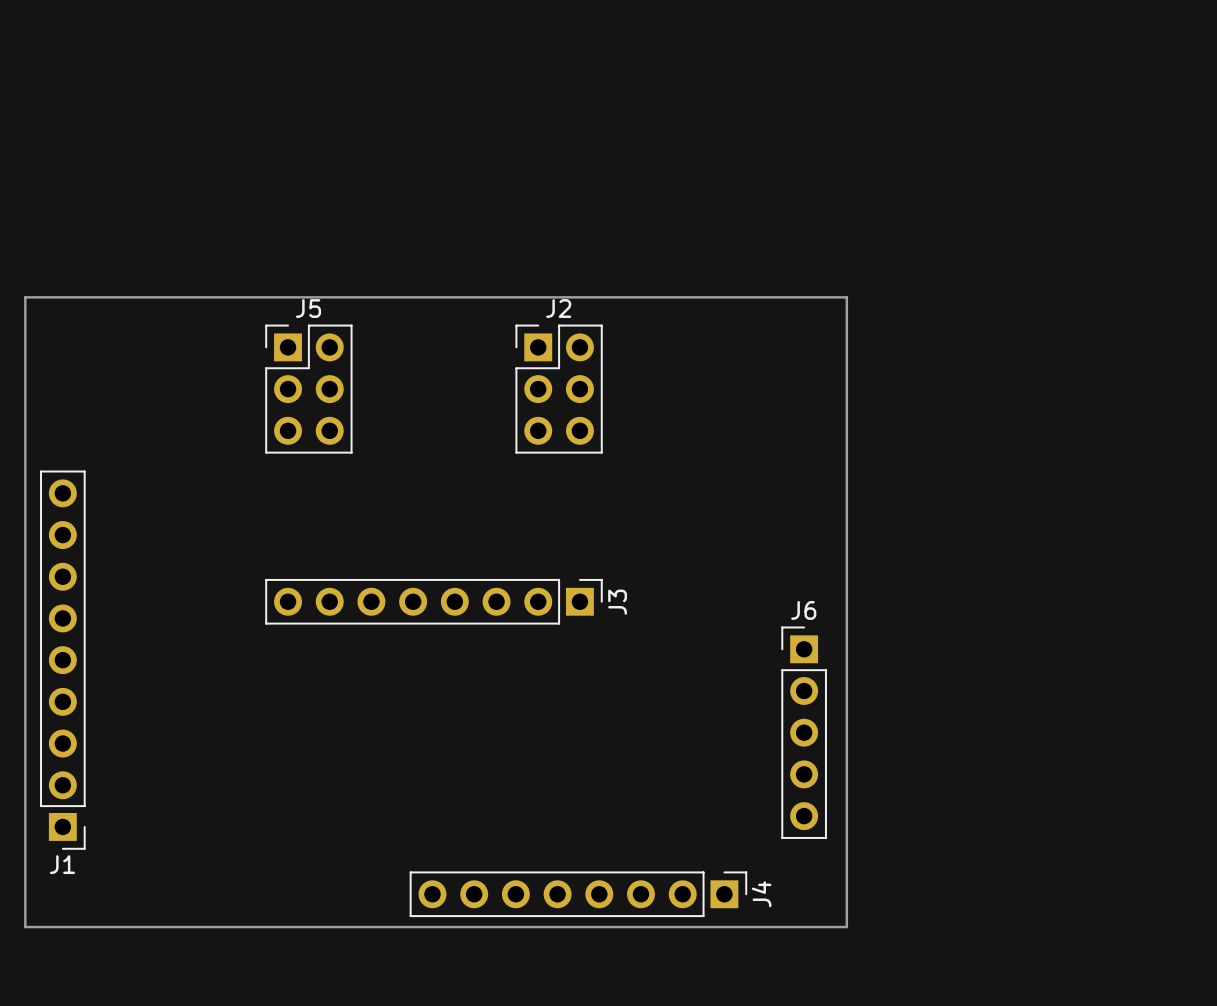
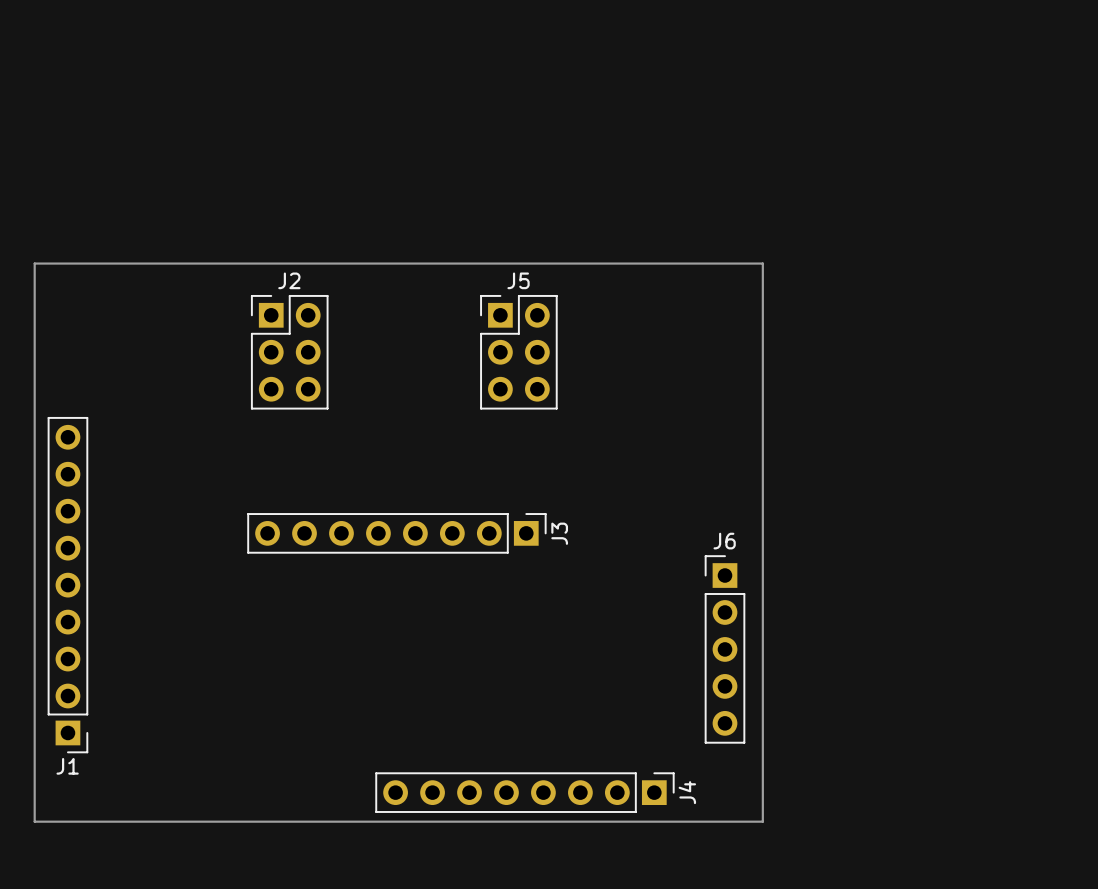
J5 position: (308, 389) -> (518, 352)
J2 position: (559, 389) -> (289, 352)

